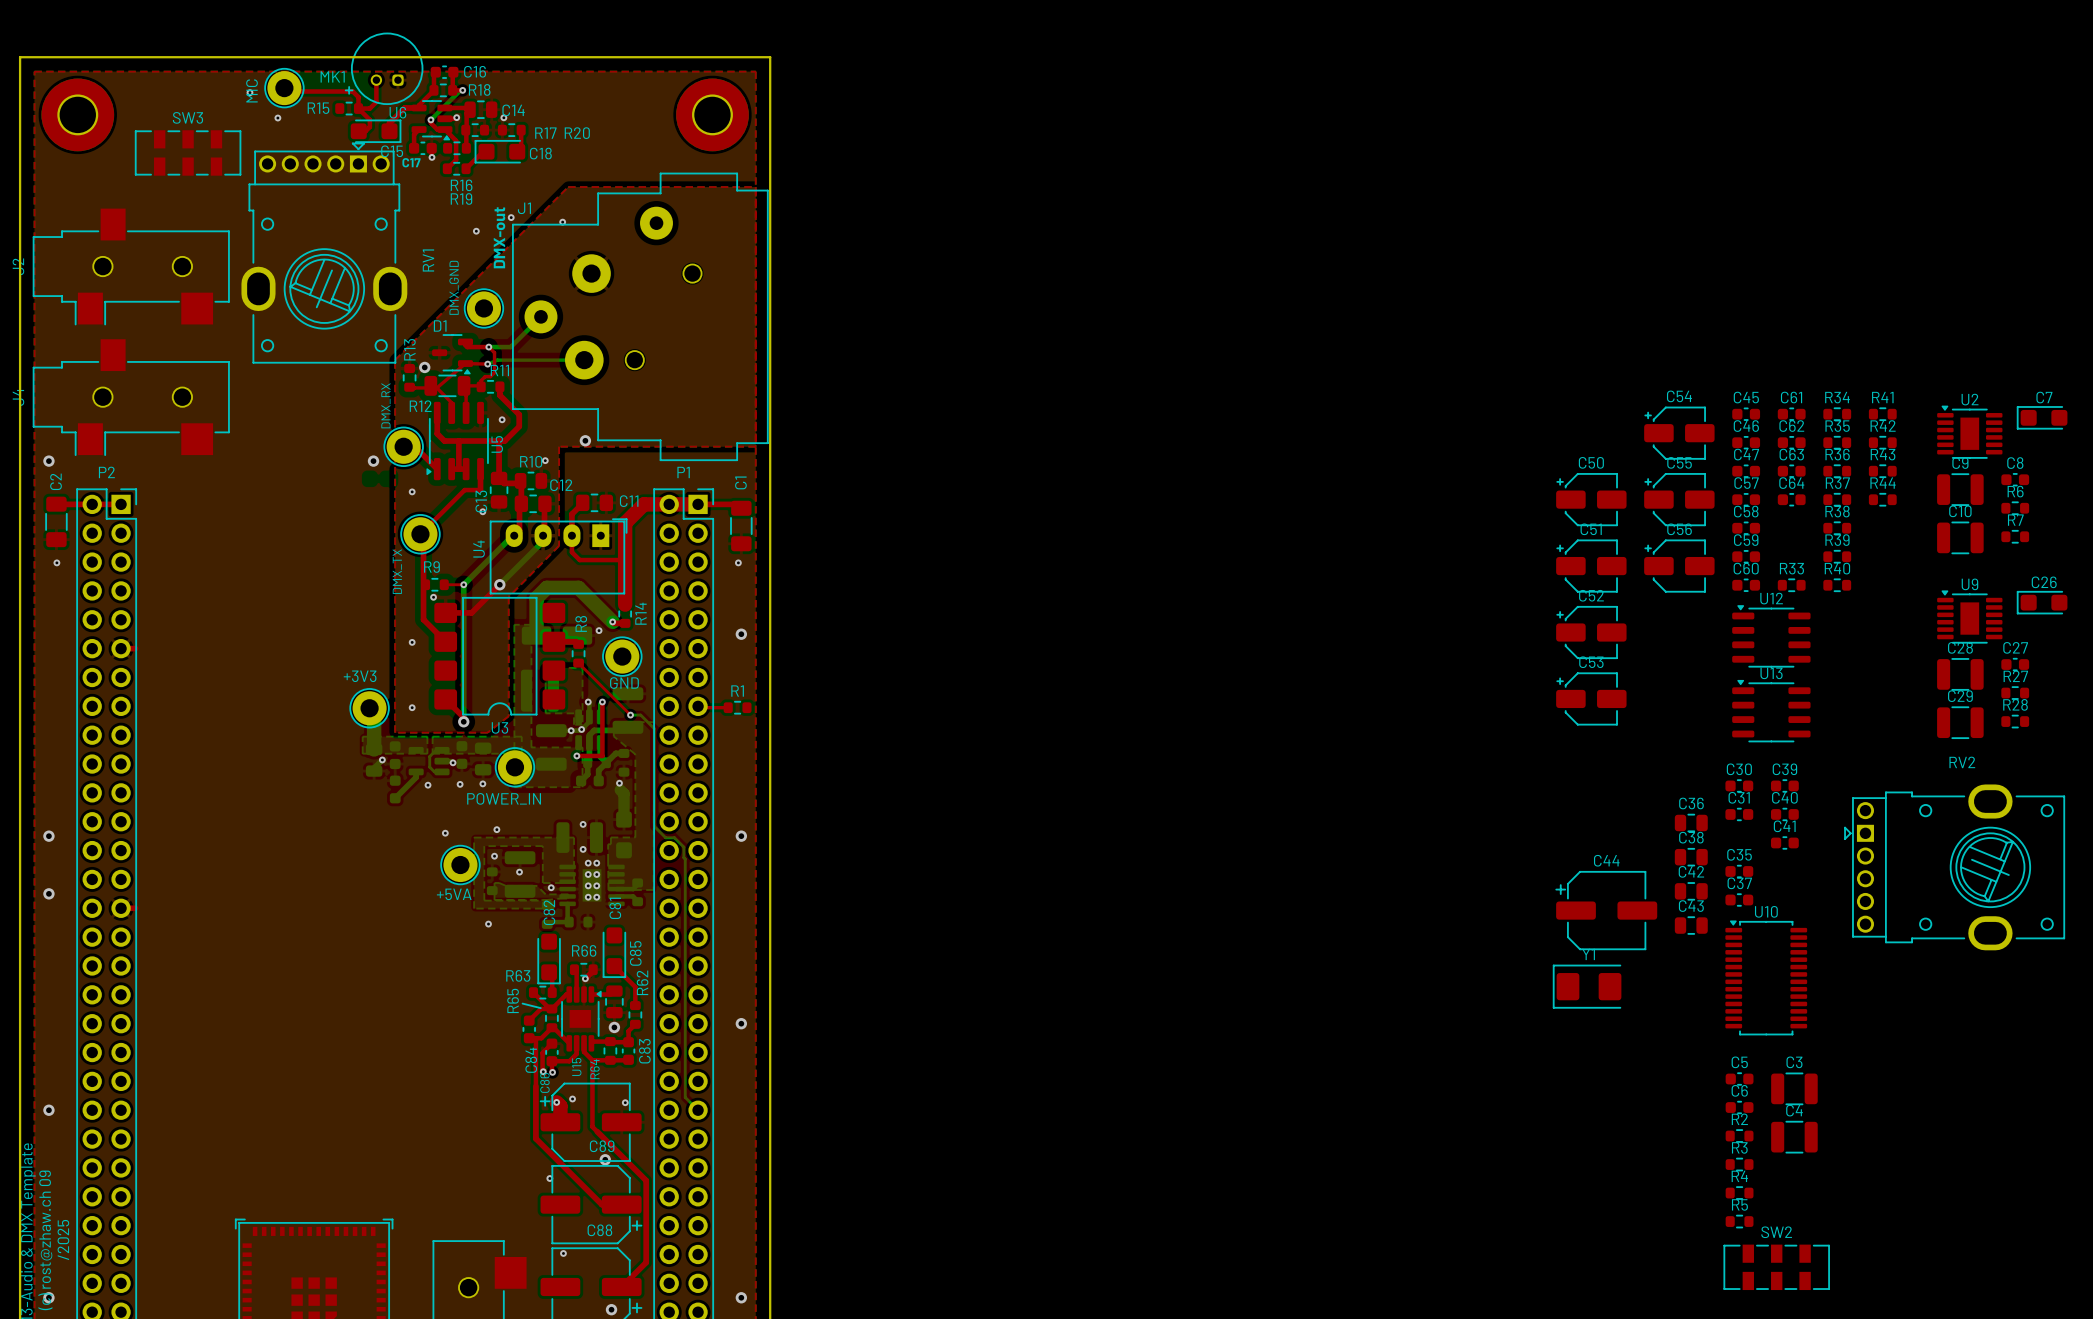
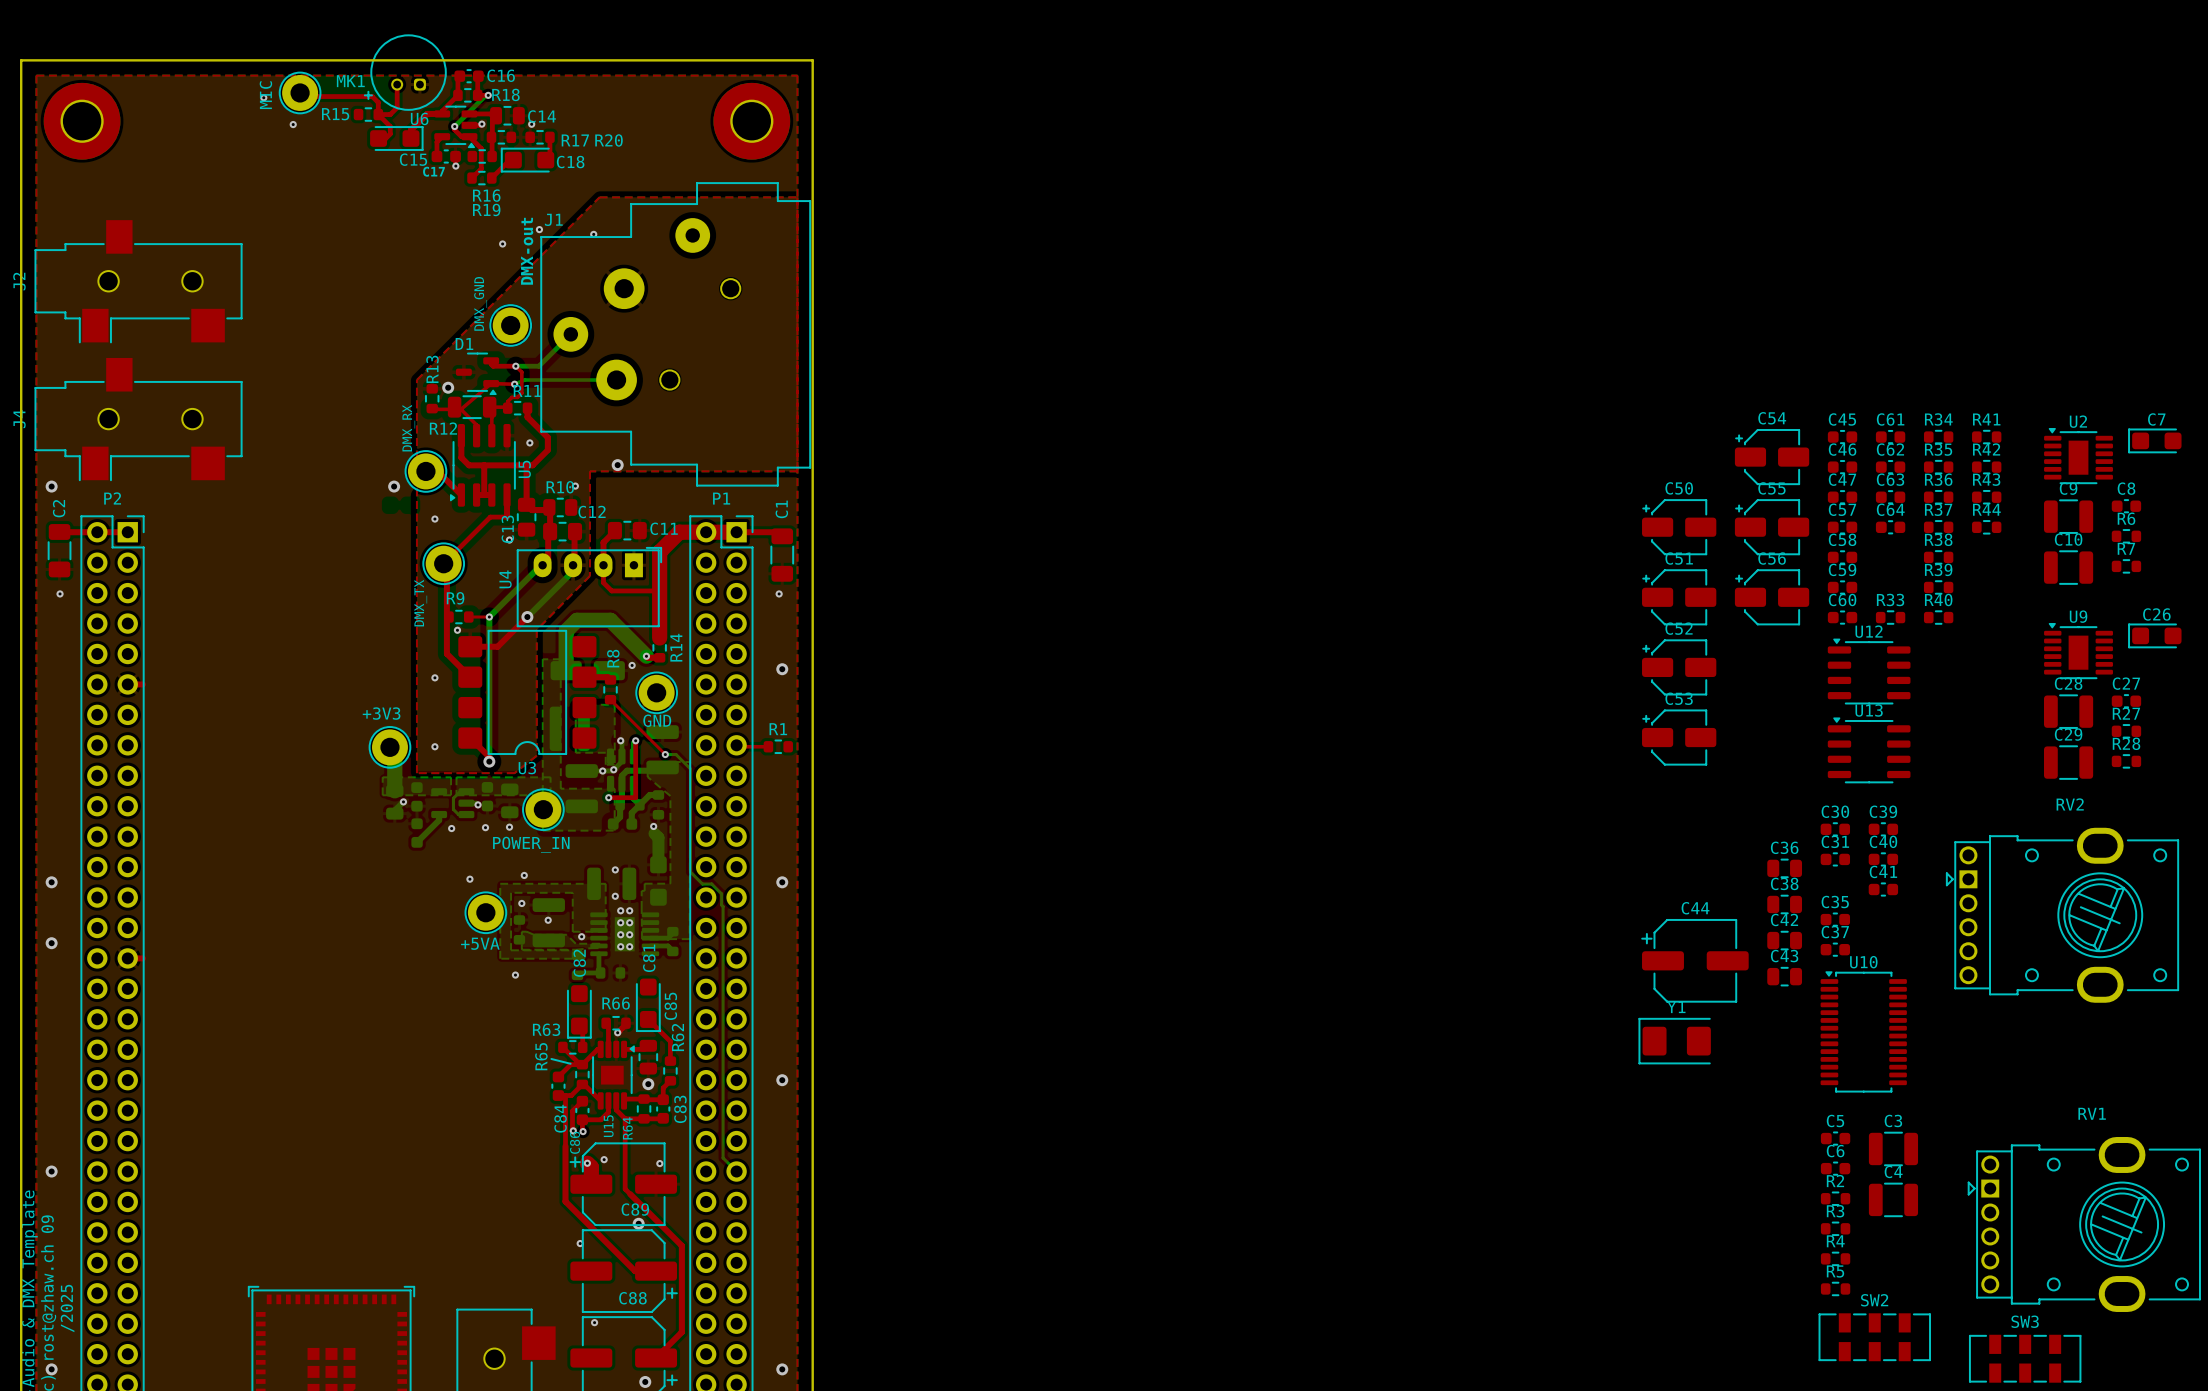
SW3 position: (188, 152) -> (2025, 1358)
RV1 rotation: 0° (324, 253) -> 90° counterclockwise (2084, 1224)
RV1 position: (324, 253) -> (2084, 1224)

